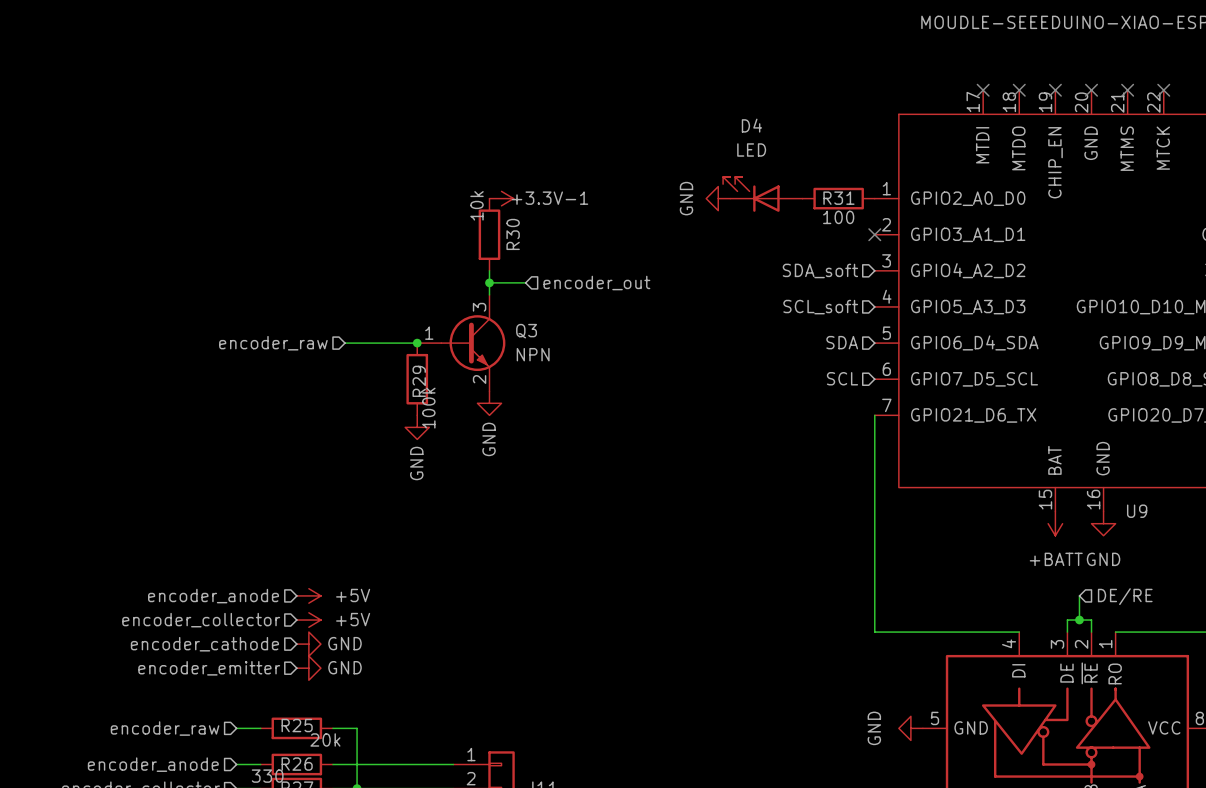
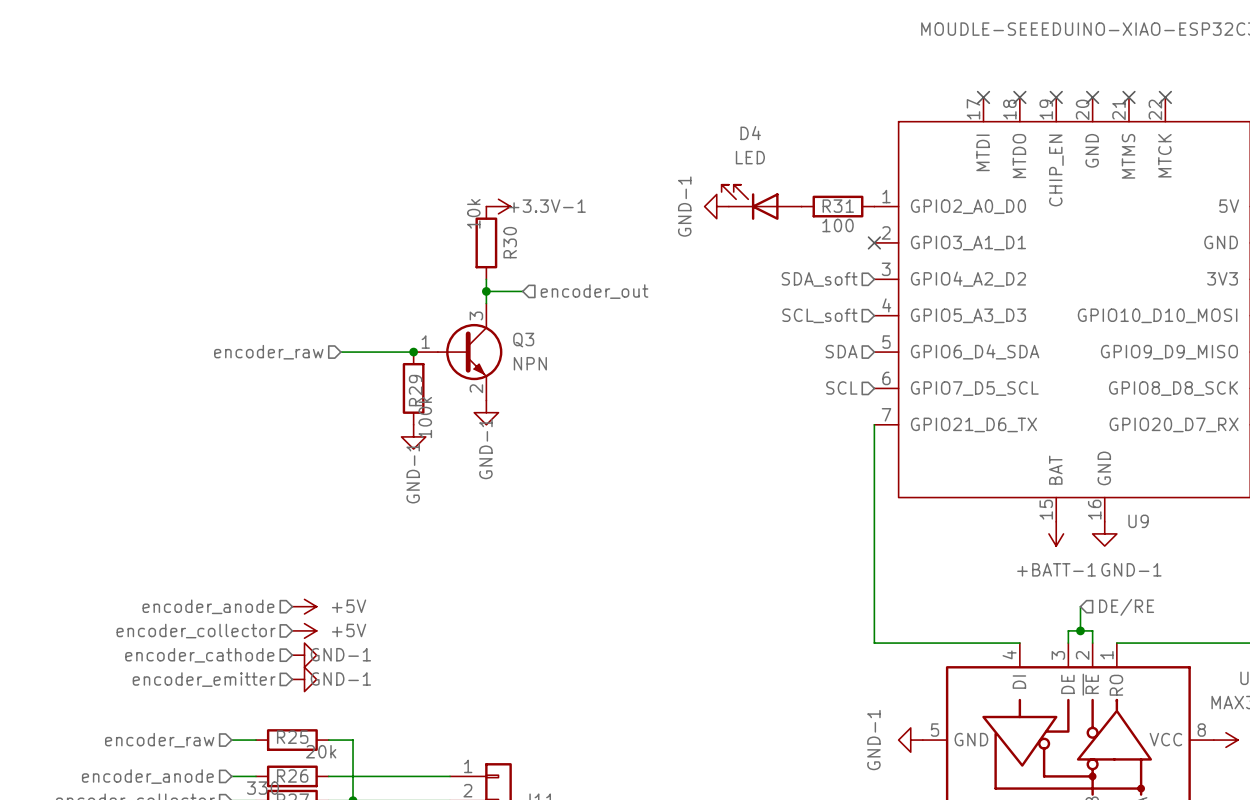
power symbol: GND (718, 198) -> GND-1 (716, 206)
power symbol: GND (489, 403) -> GND-1 (486, 412)
power symbol: GND (417, 427) -> GND-1 (413, 436)
power symbol: +BATT (1055, 523) -> +BATT-1 (1056, 533)
power symbol: GND (1103, 523) -> GND-1 (1104, 533)
power symbol: GND (308, 644) -> GND-1 (304, 655)
power symbol: GND (308, 668) -> GND-1 (304, 679)
power symbol: GND (910, 728) -> GND-1 (910, 740)

